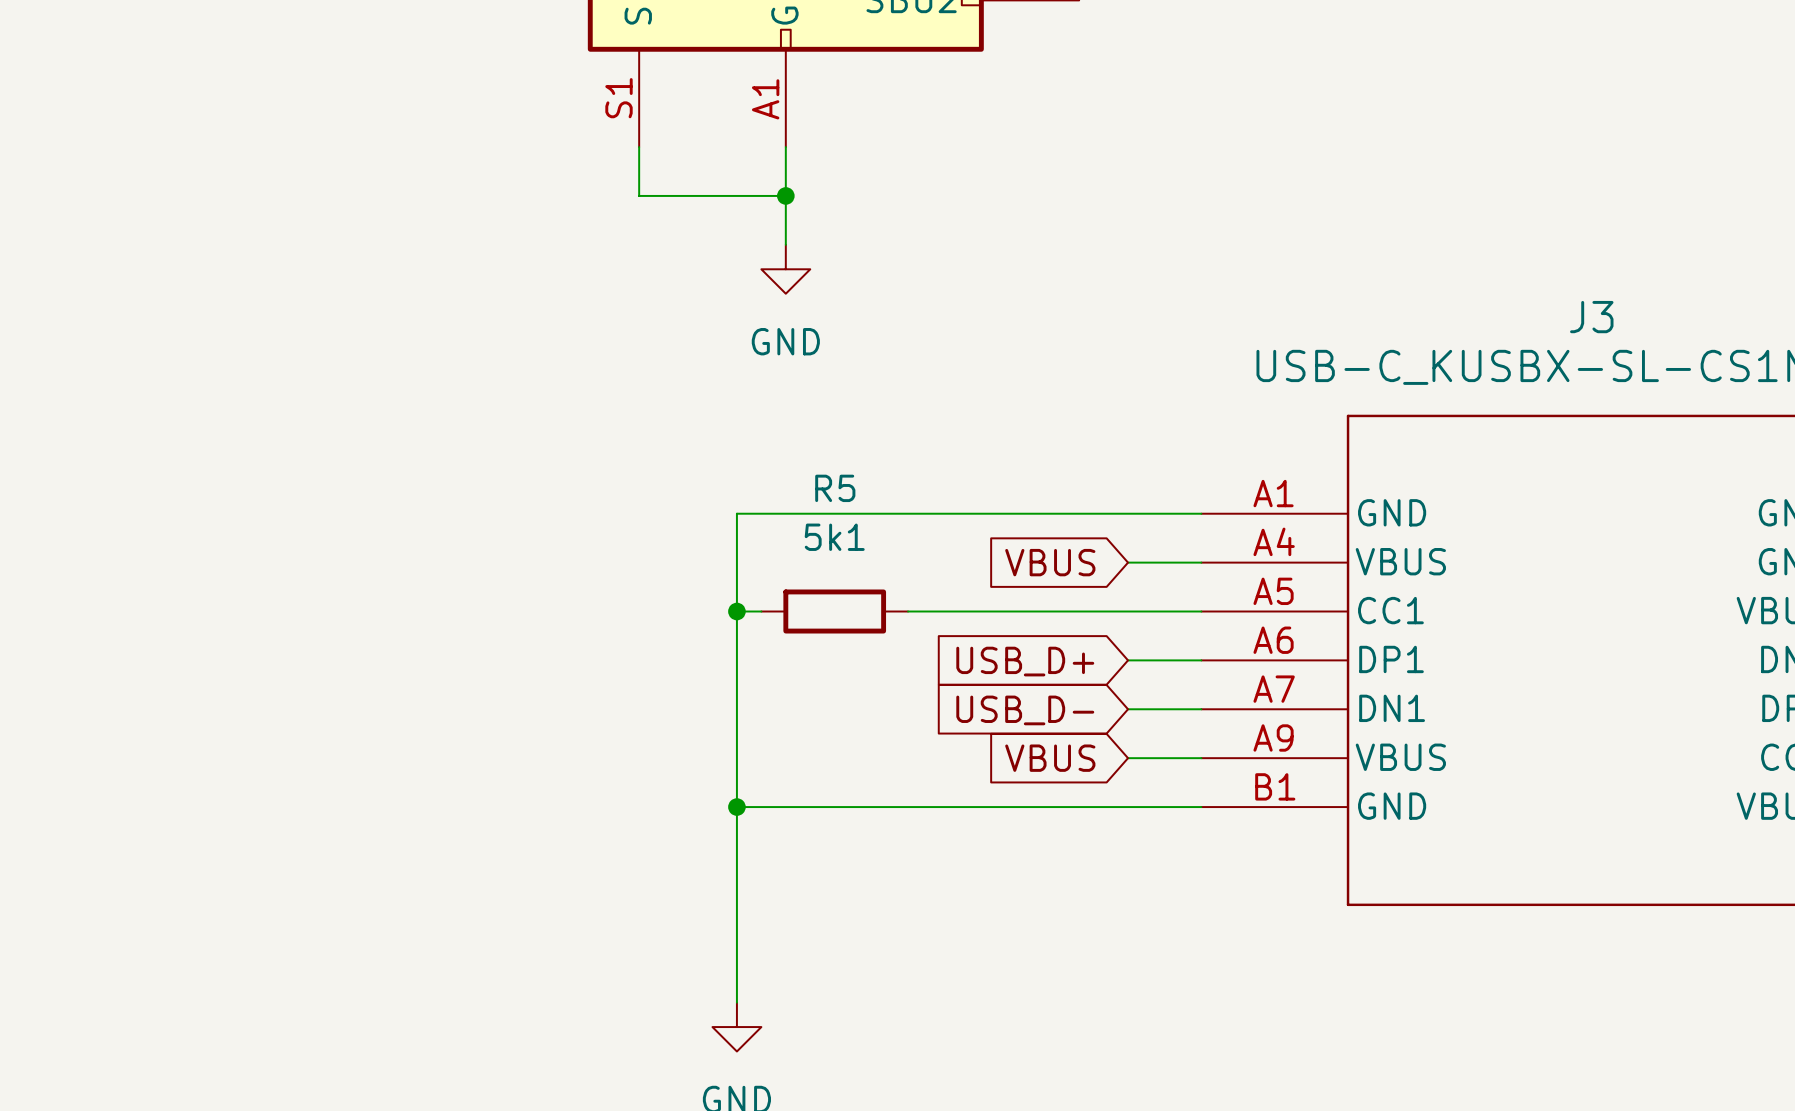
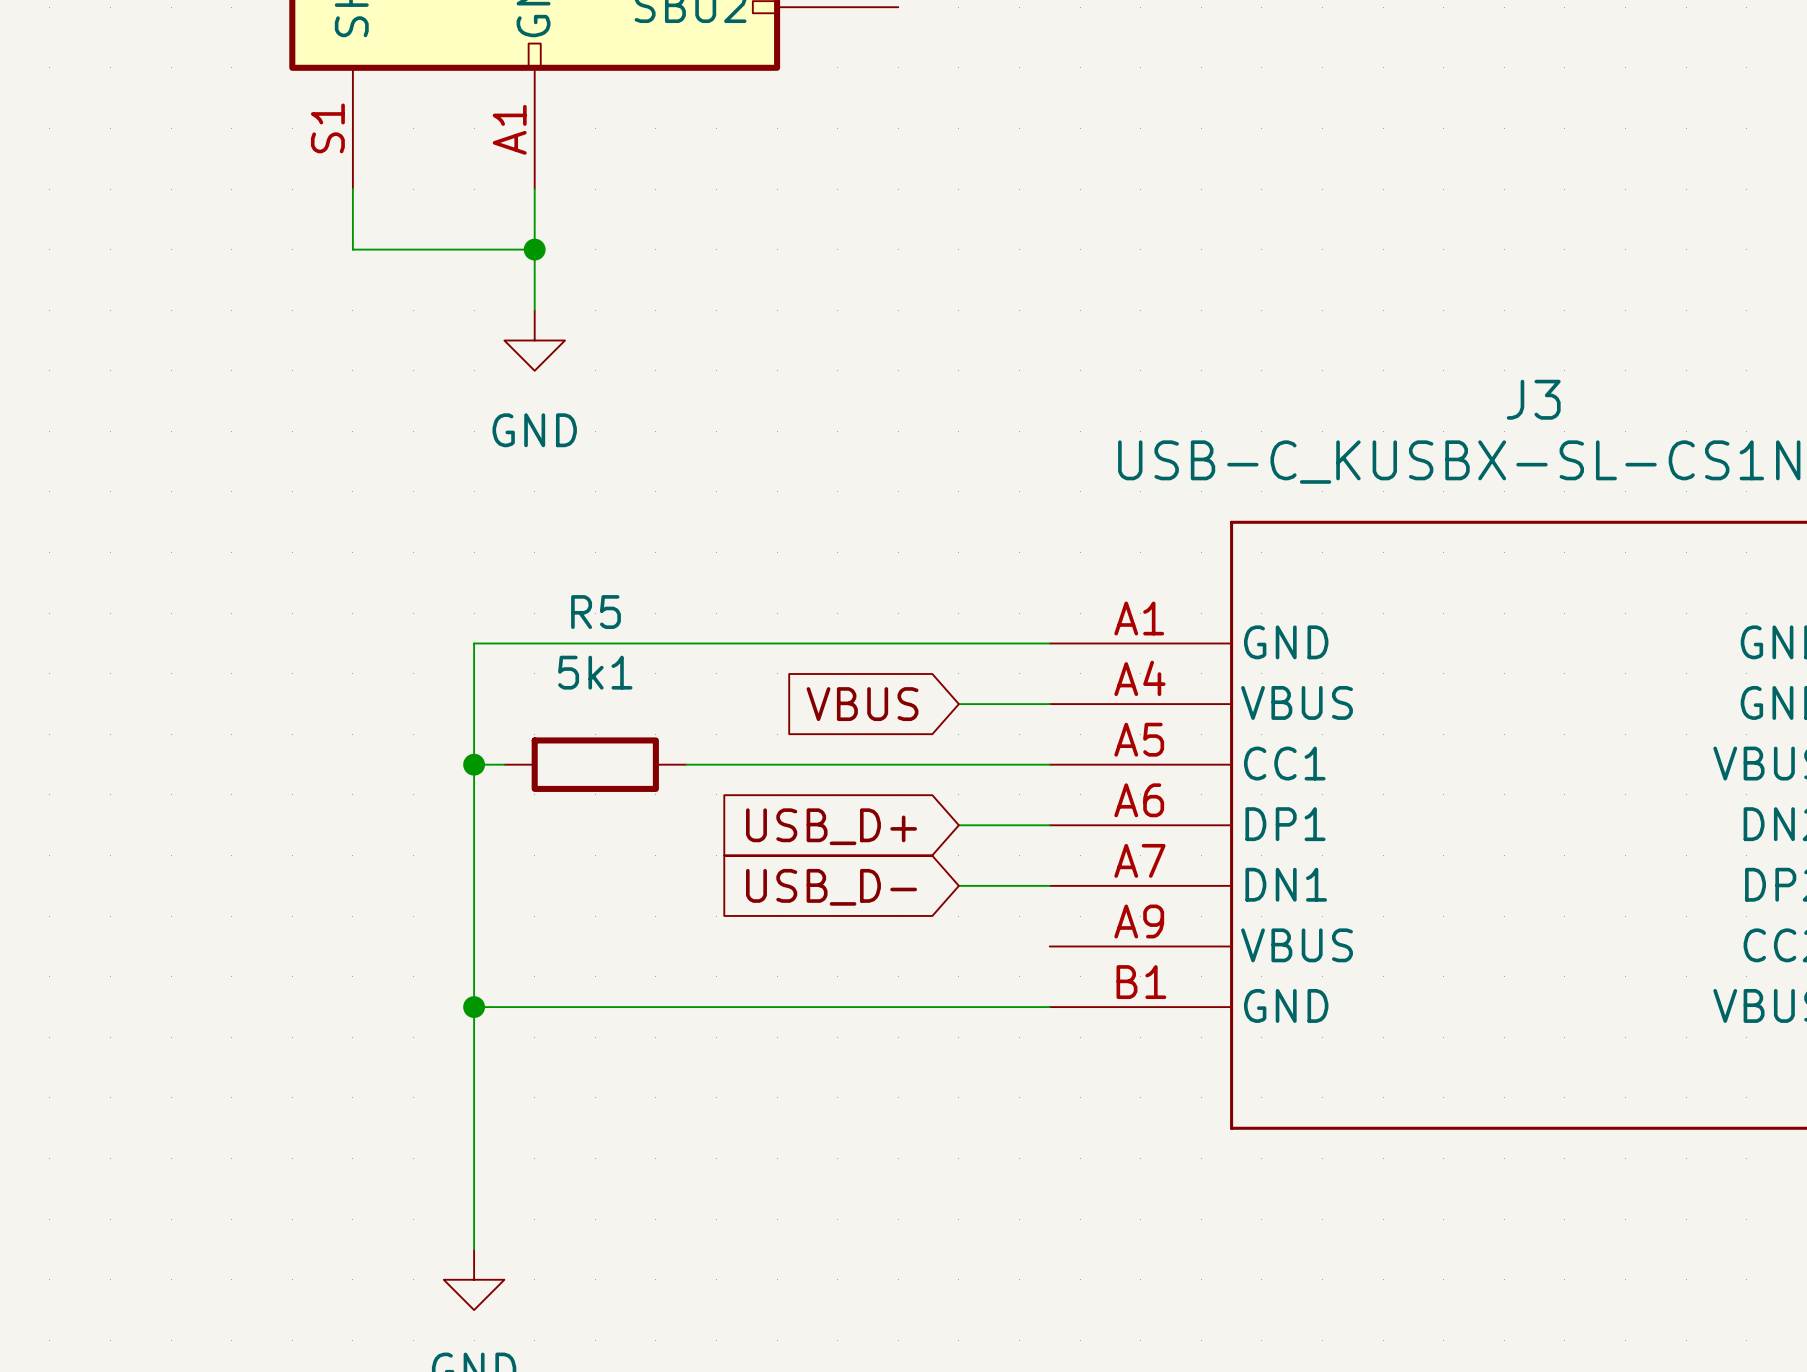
global label: VBUS (1050, 758) -> none
wire: (1128, 758) (1201, 758) -> none

